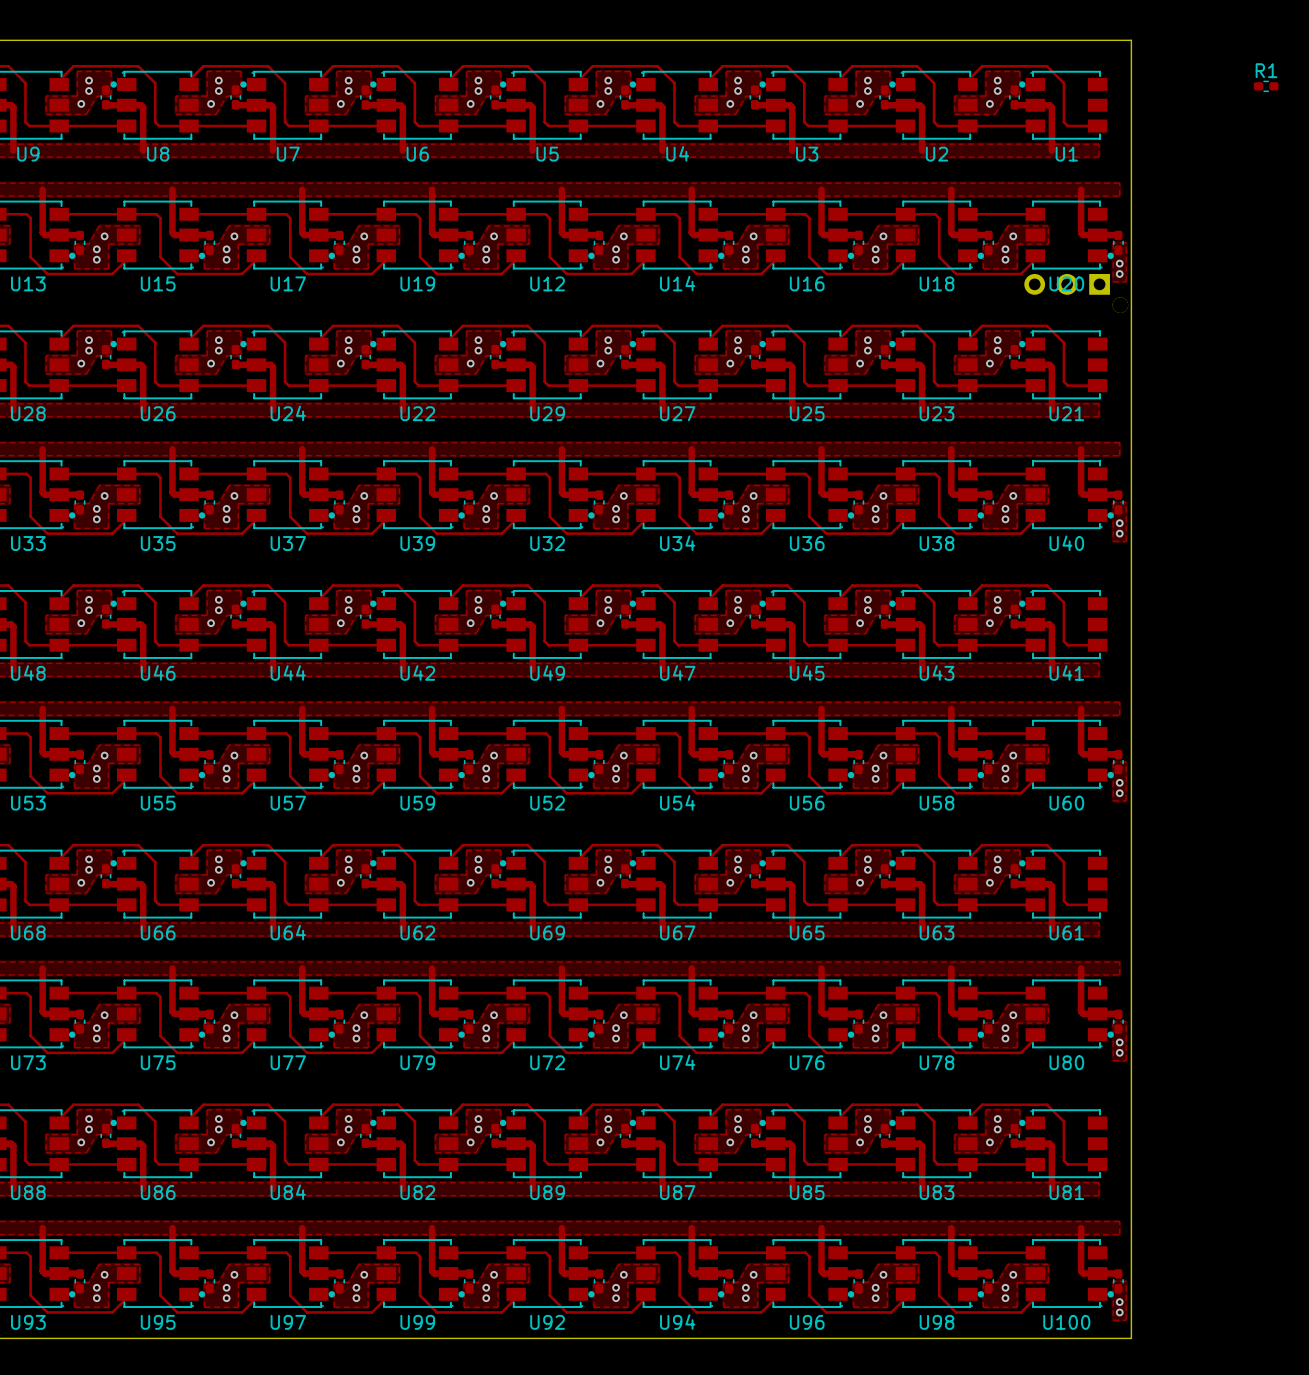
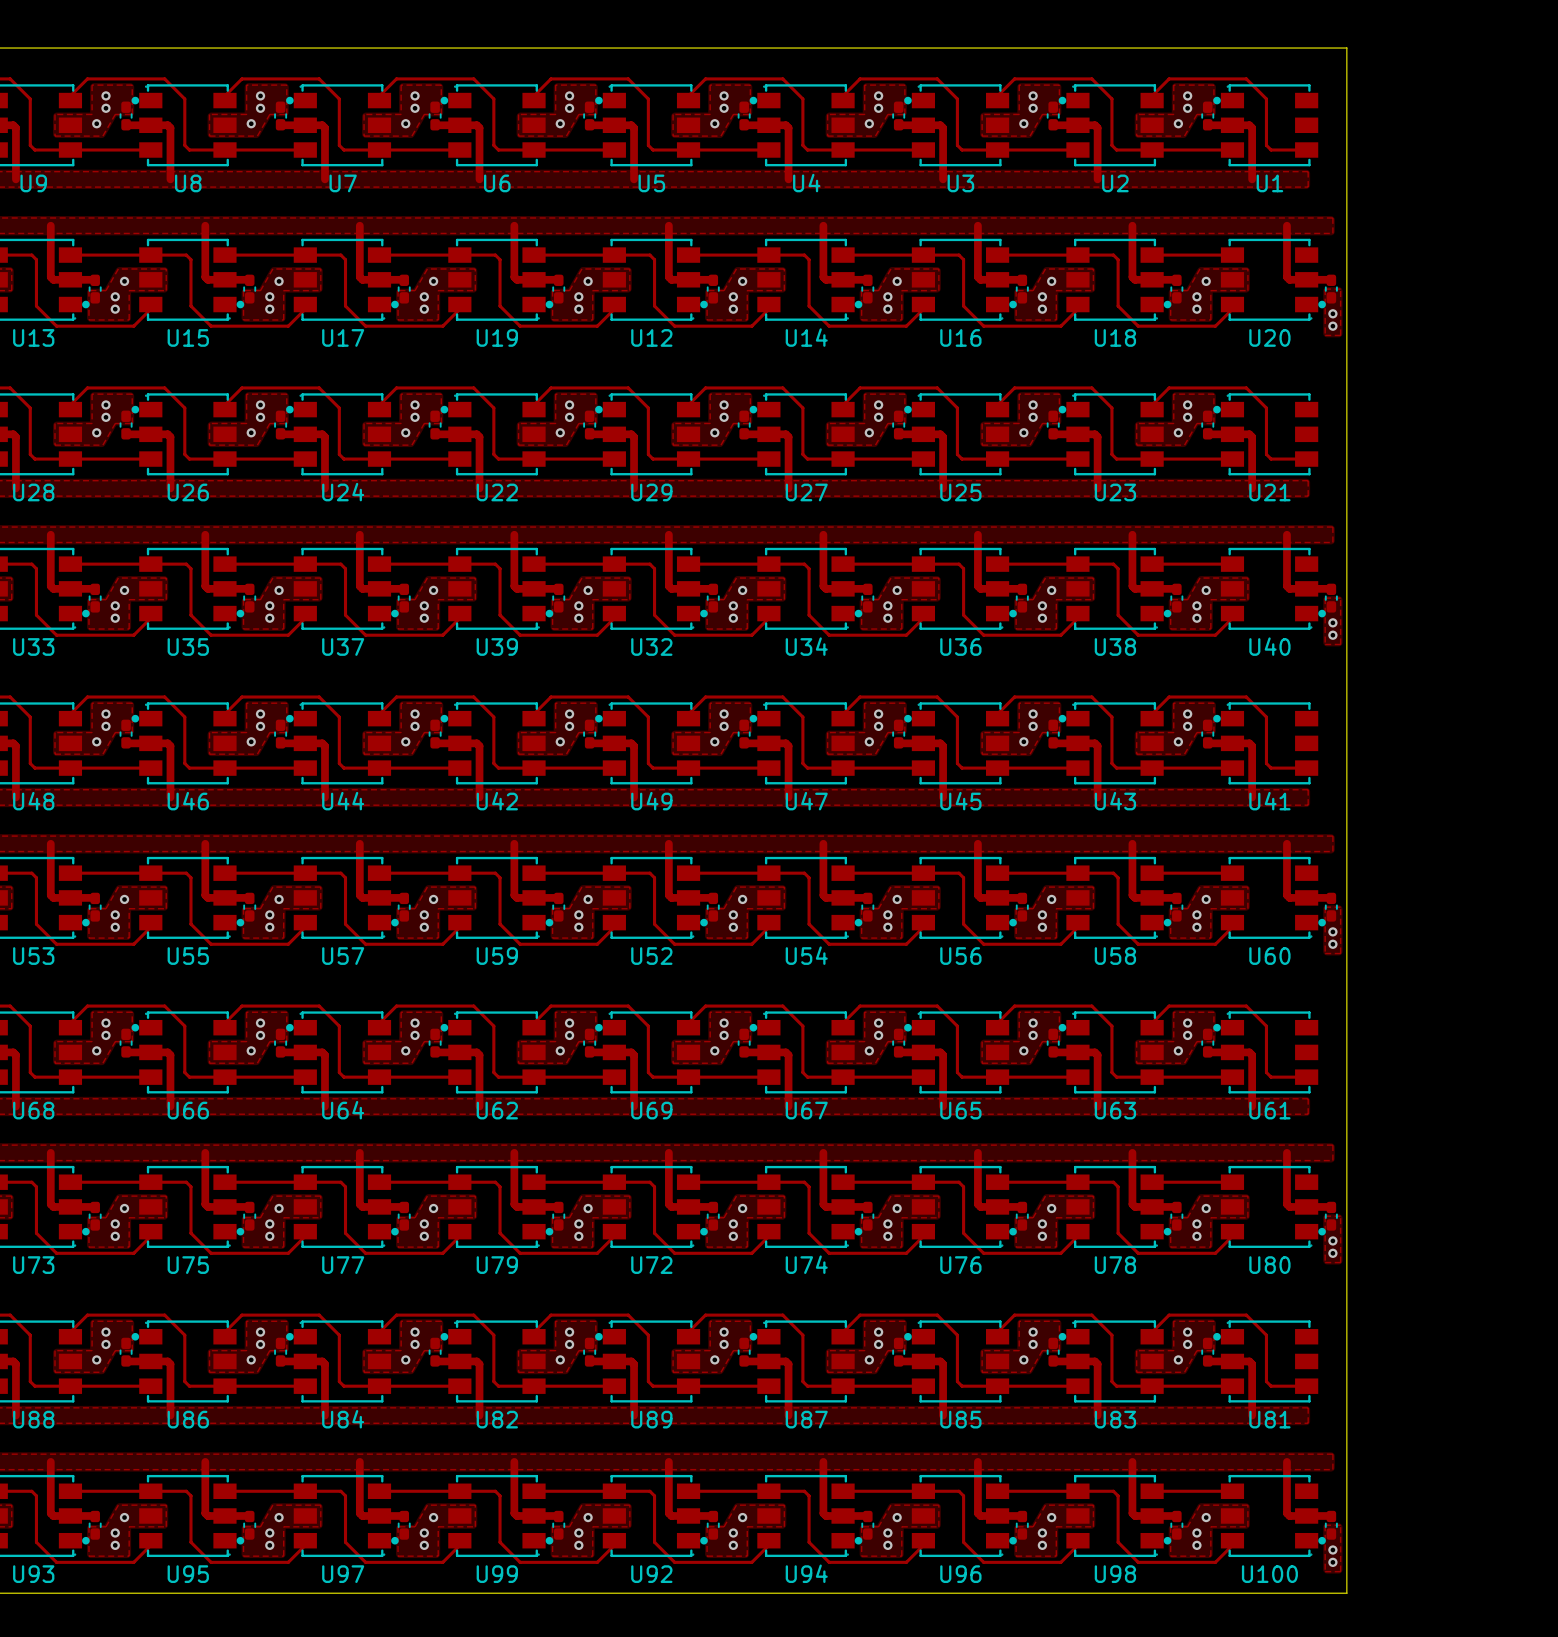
R1: (1266, 86) -> none
part: (1076, 293) -> none

